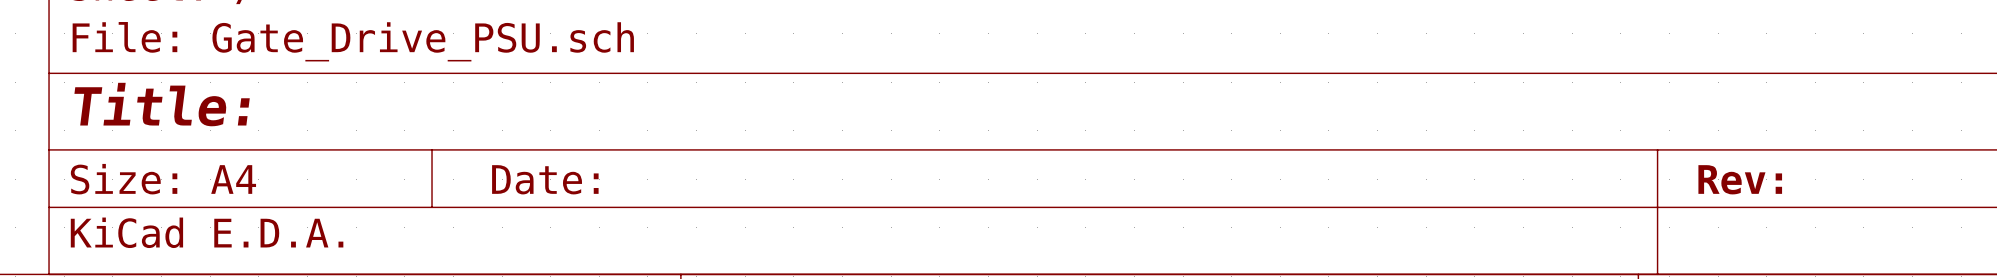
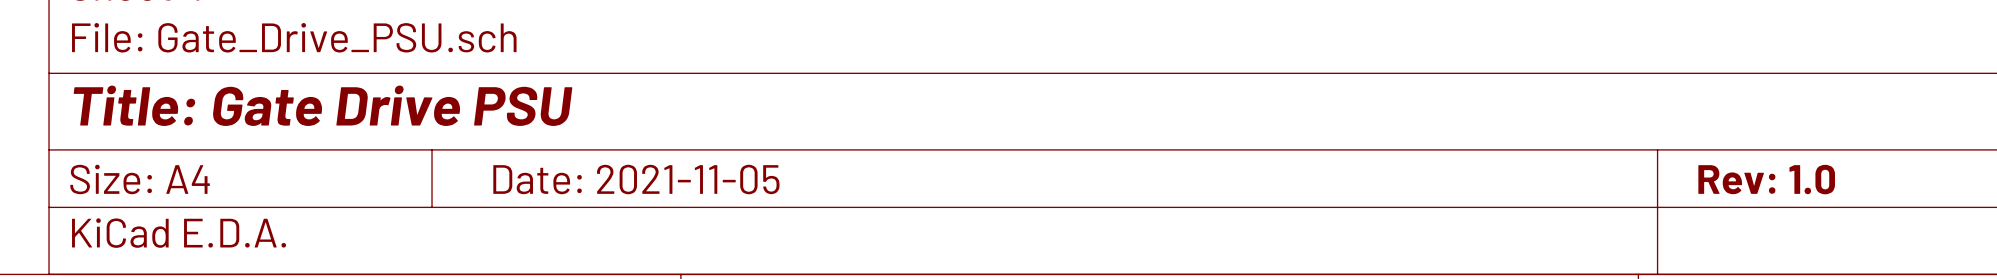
title block: Title: (162, 104) -> Title: Gate Drive PSU (323, 105)
title block: Date: (545, 179) -> Date: 2021-11-05 (636, 179)
title block: Rev: (1740, 179) -> Rev: 1.0 (1766, 179)

